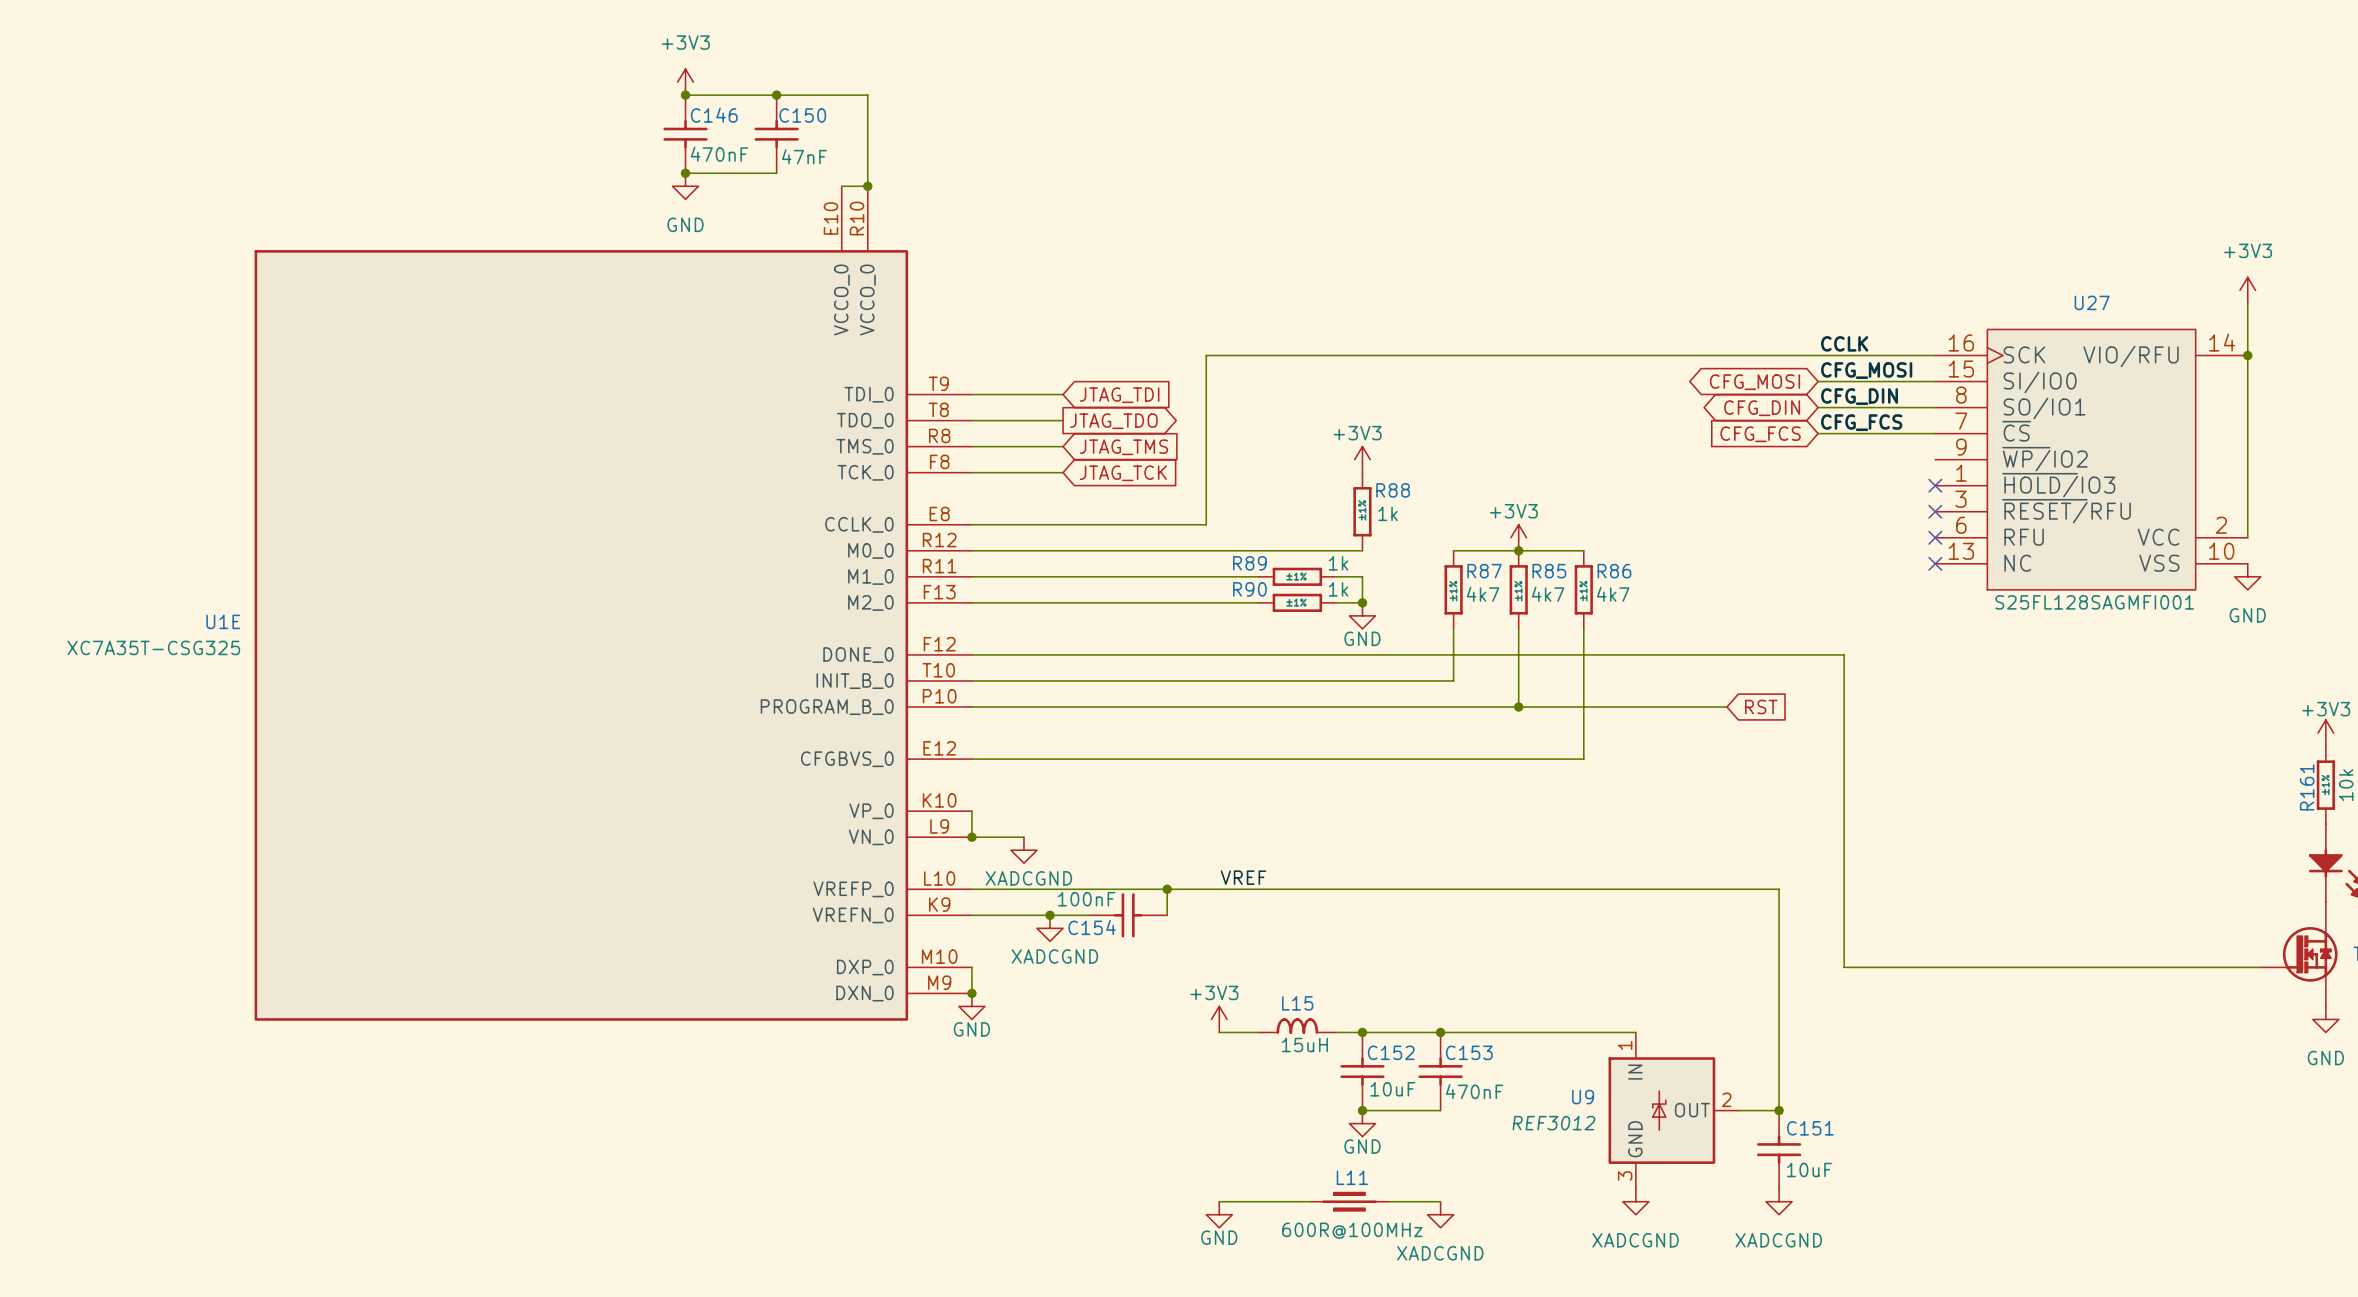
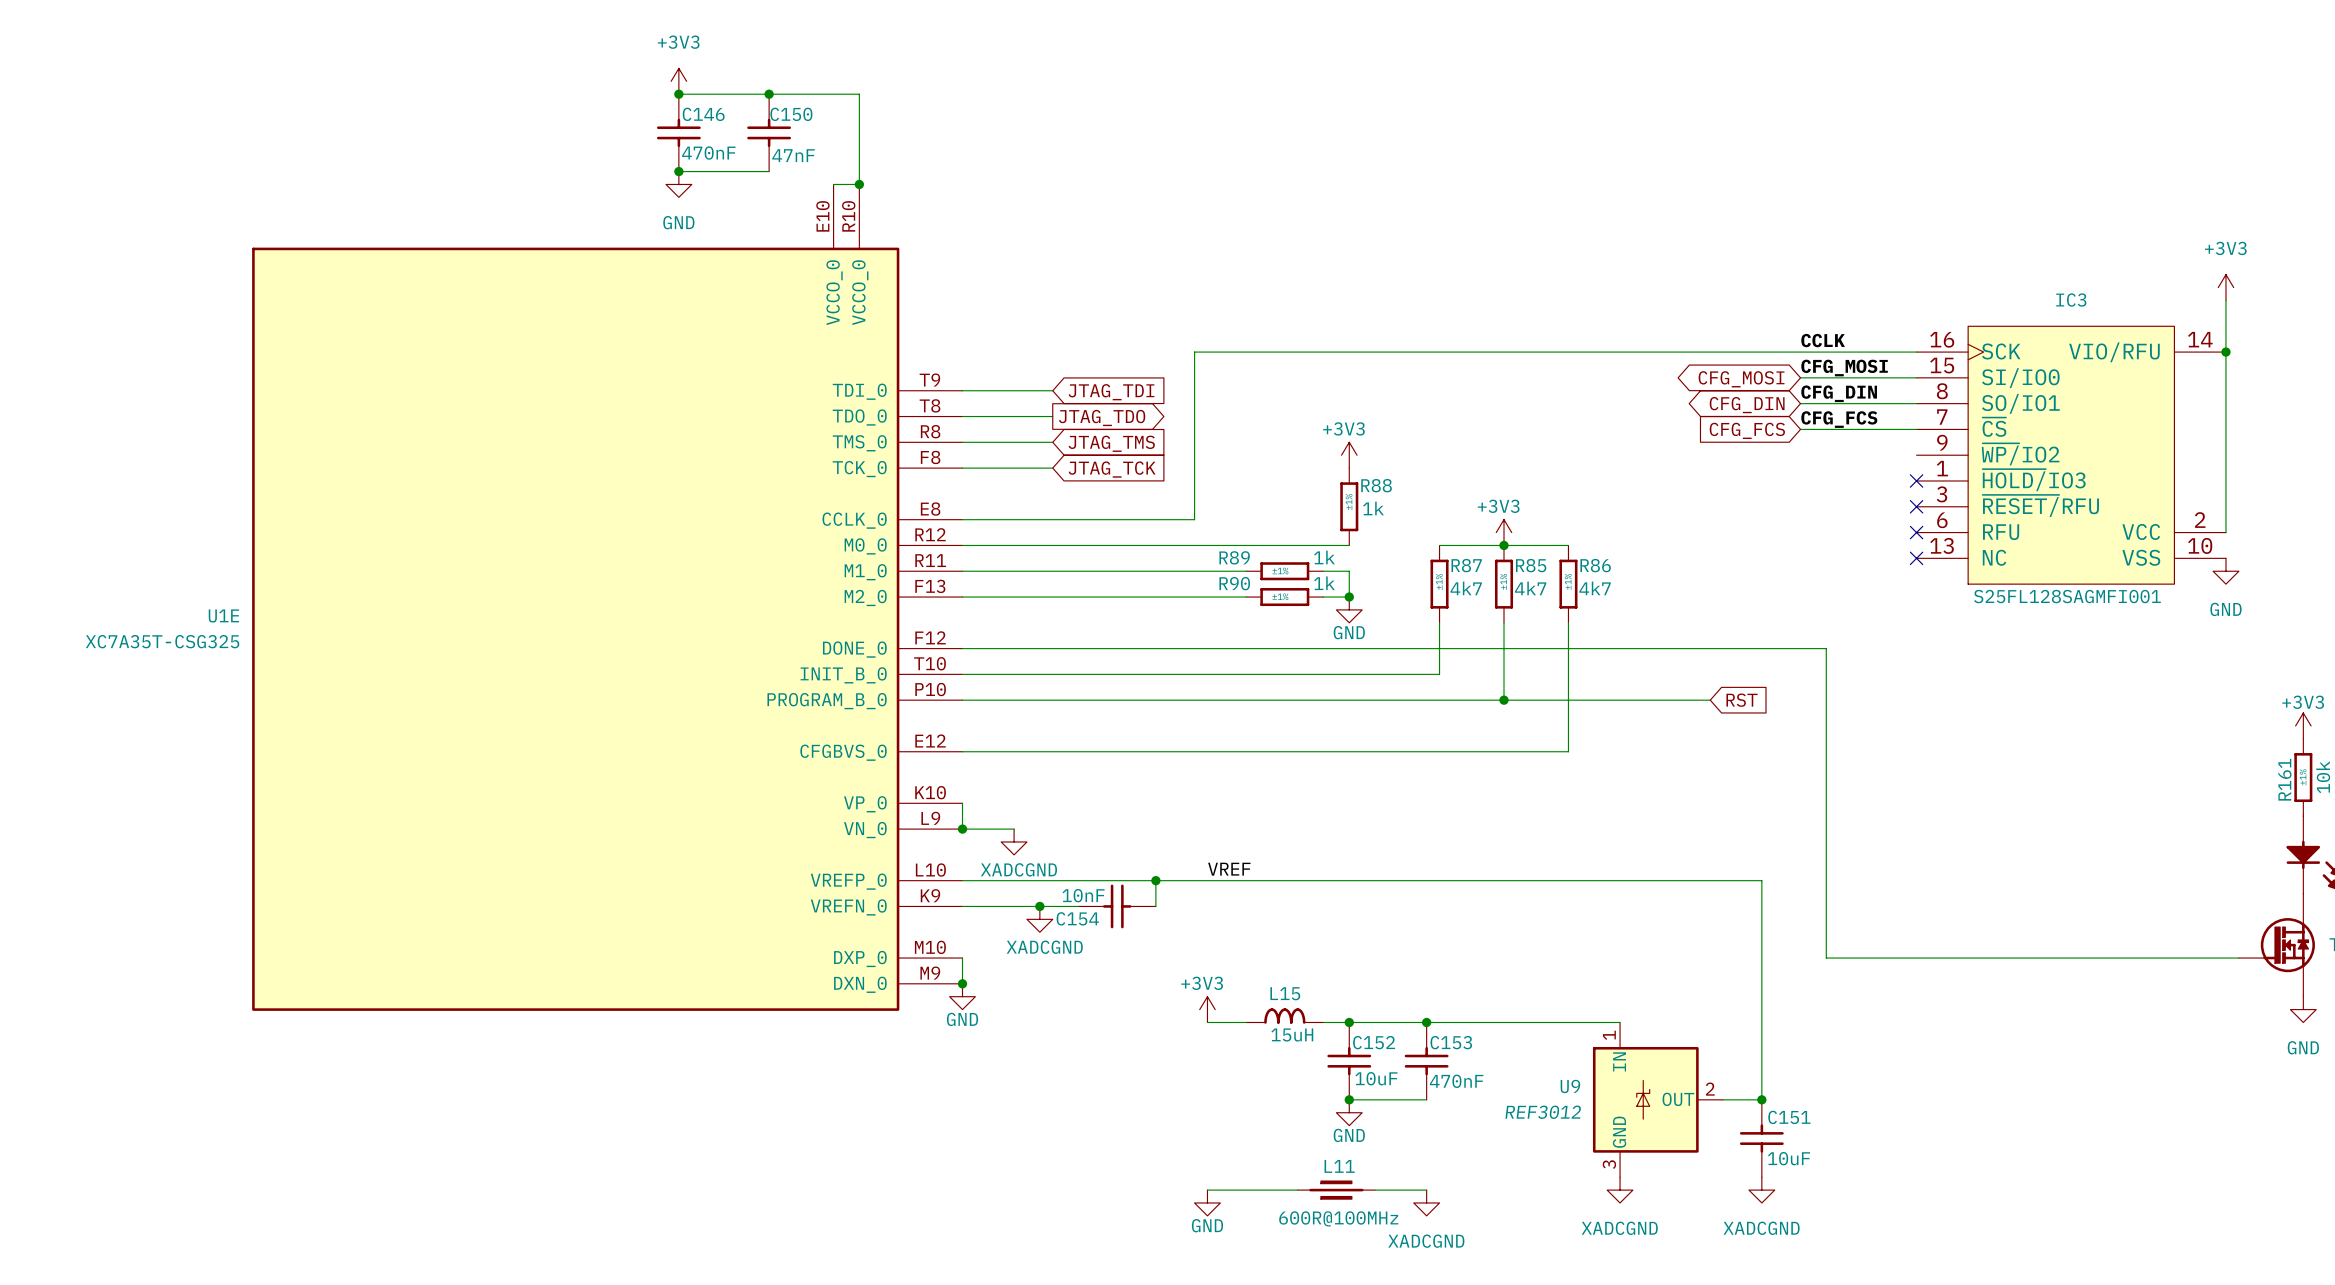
U27 name: U27 (2092, 302) -> IC3 (2071, 300)
C154 text: 100nF (1086, 899) -> none
C154 text: none -> 10nF (1083, 895)

